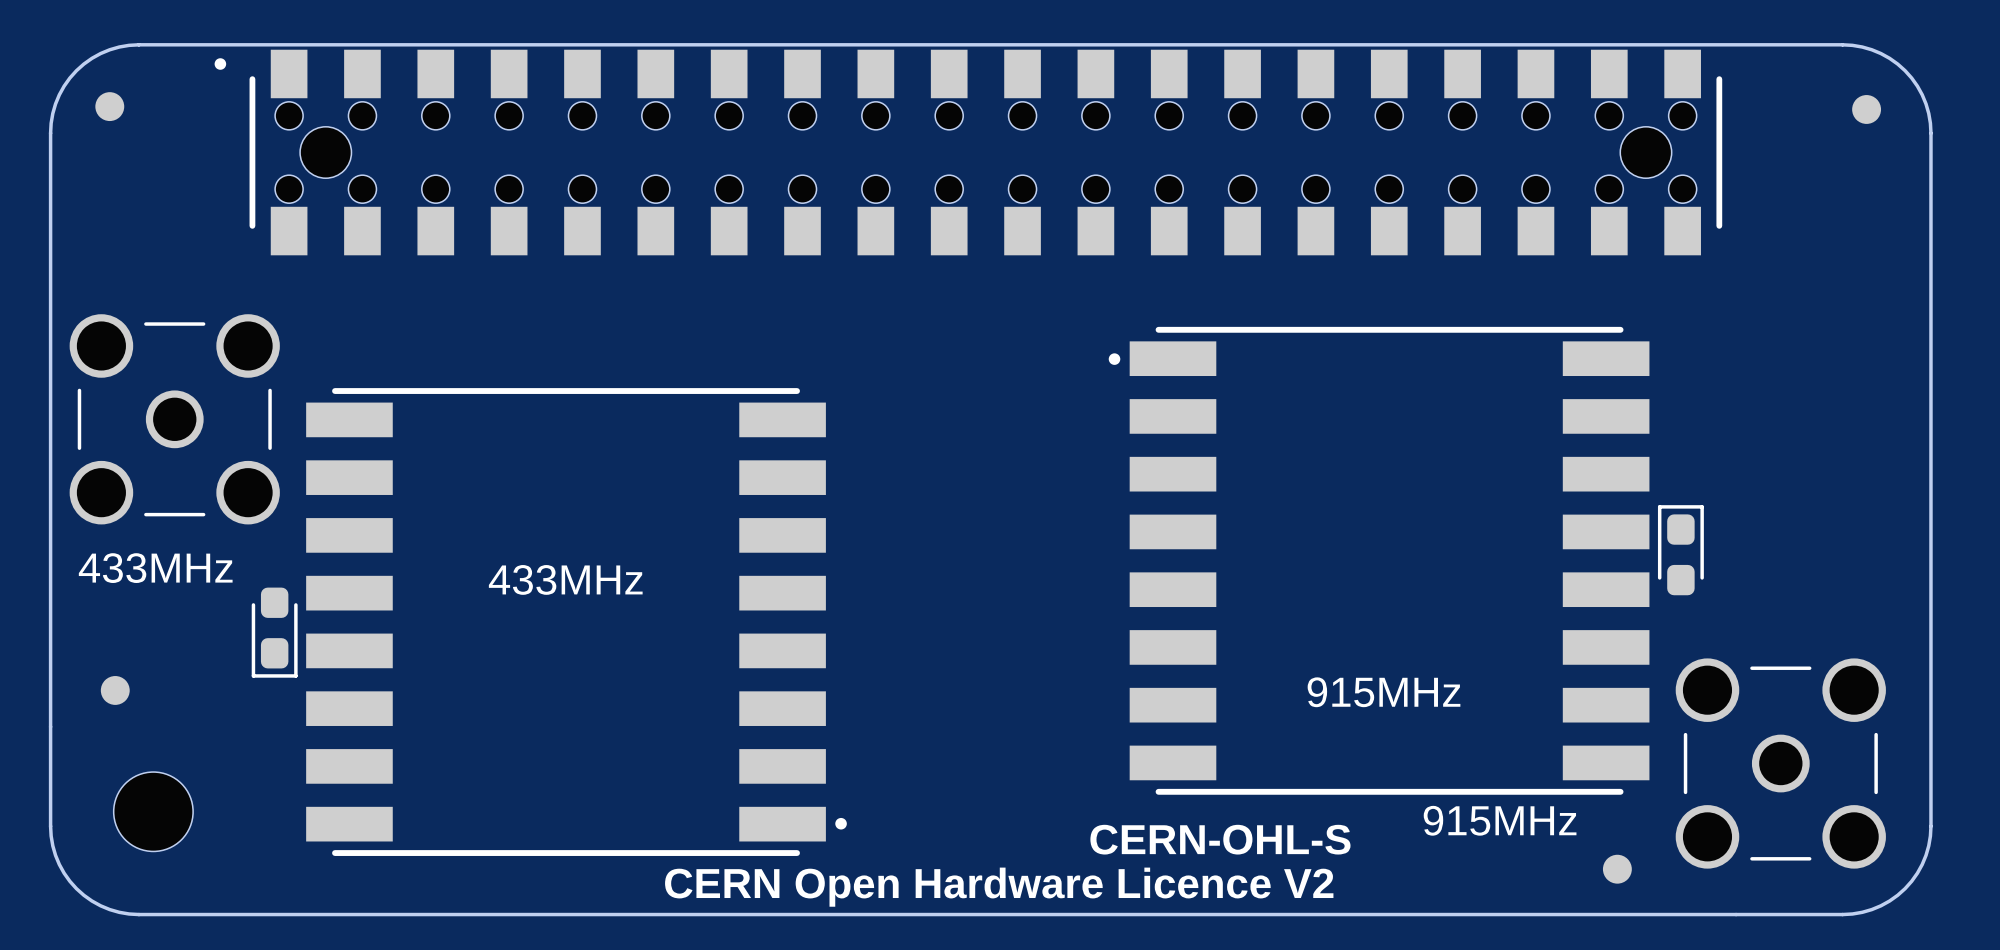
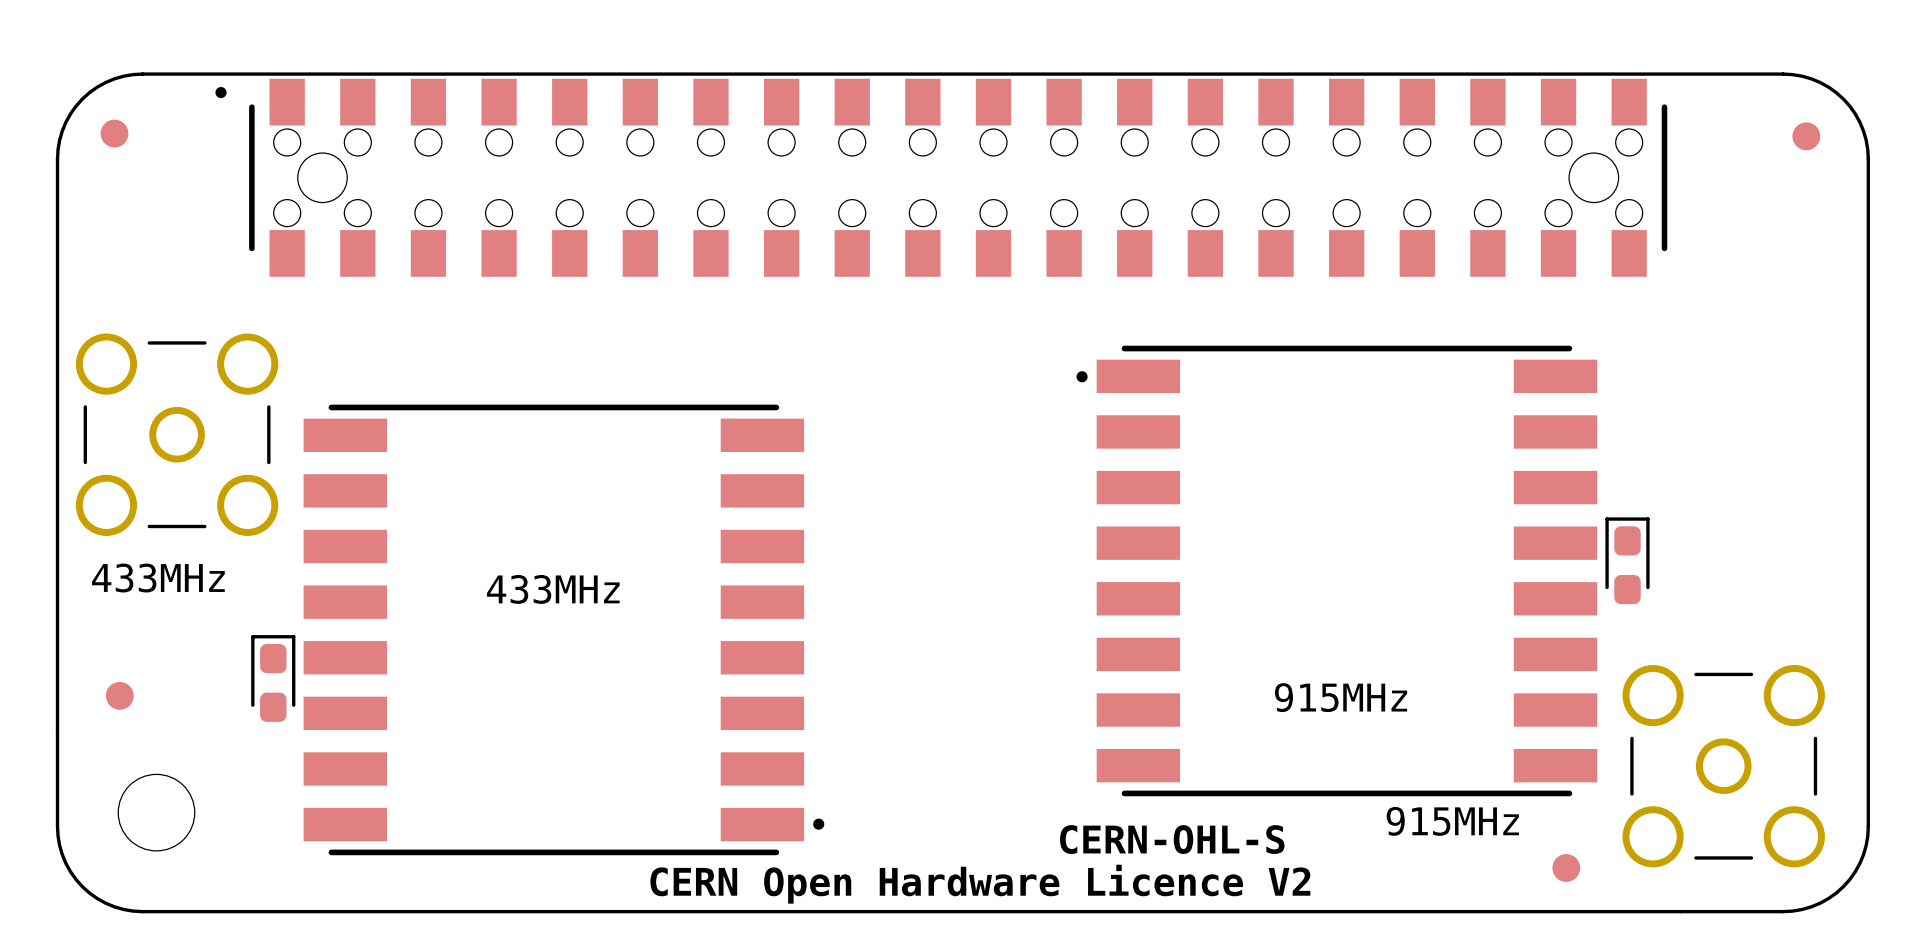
part rotation: 0° (274, 632) -> 180° (273, 678)

